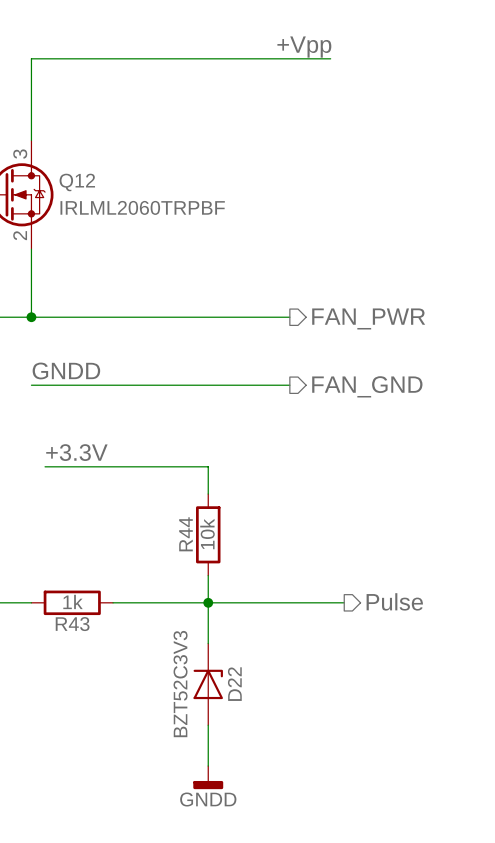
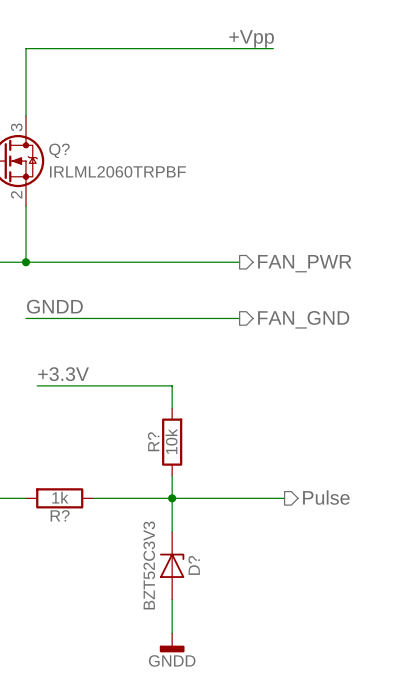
Q12 name: Q12 (77, 182) -> Q? (59, 150)
R44 name: R44 (185, 534) -> R? (153, 441)
R43 name: R43 (72, 624) -> R? (60, 515)
D22 name: D22 (234, 684) -> D? (194, 565)

